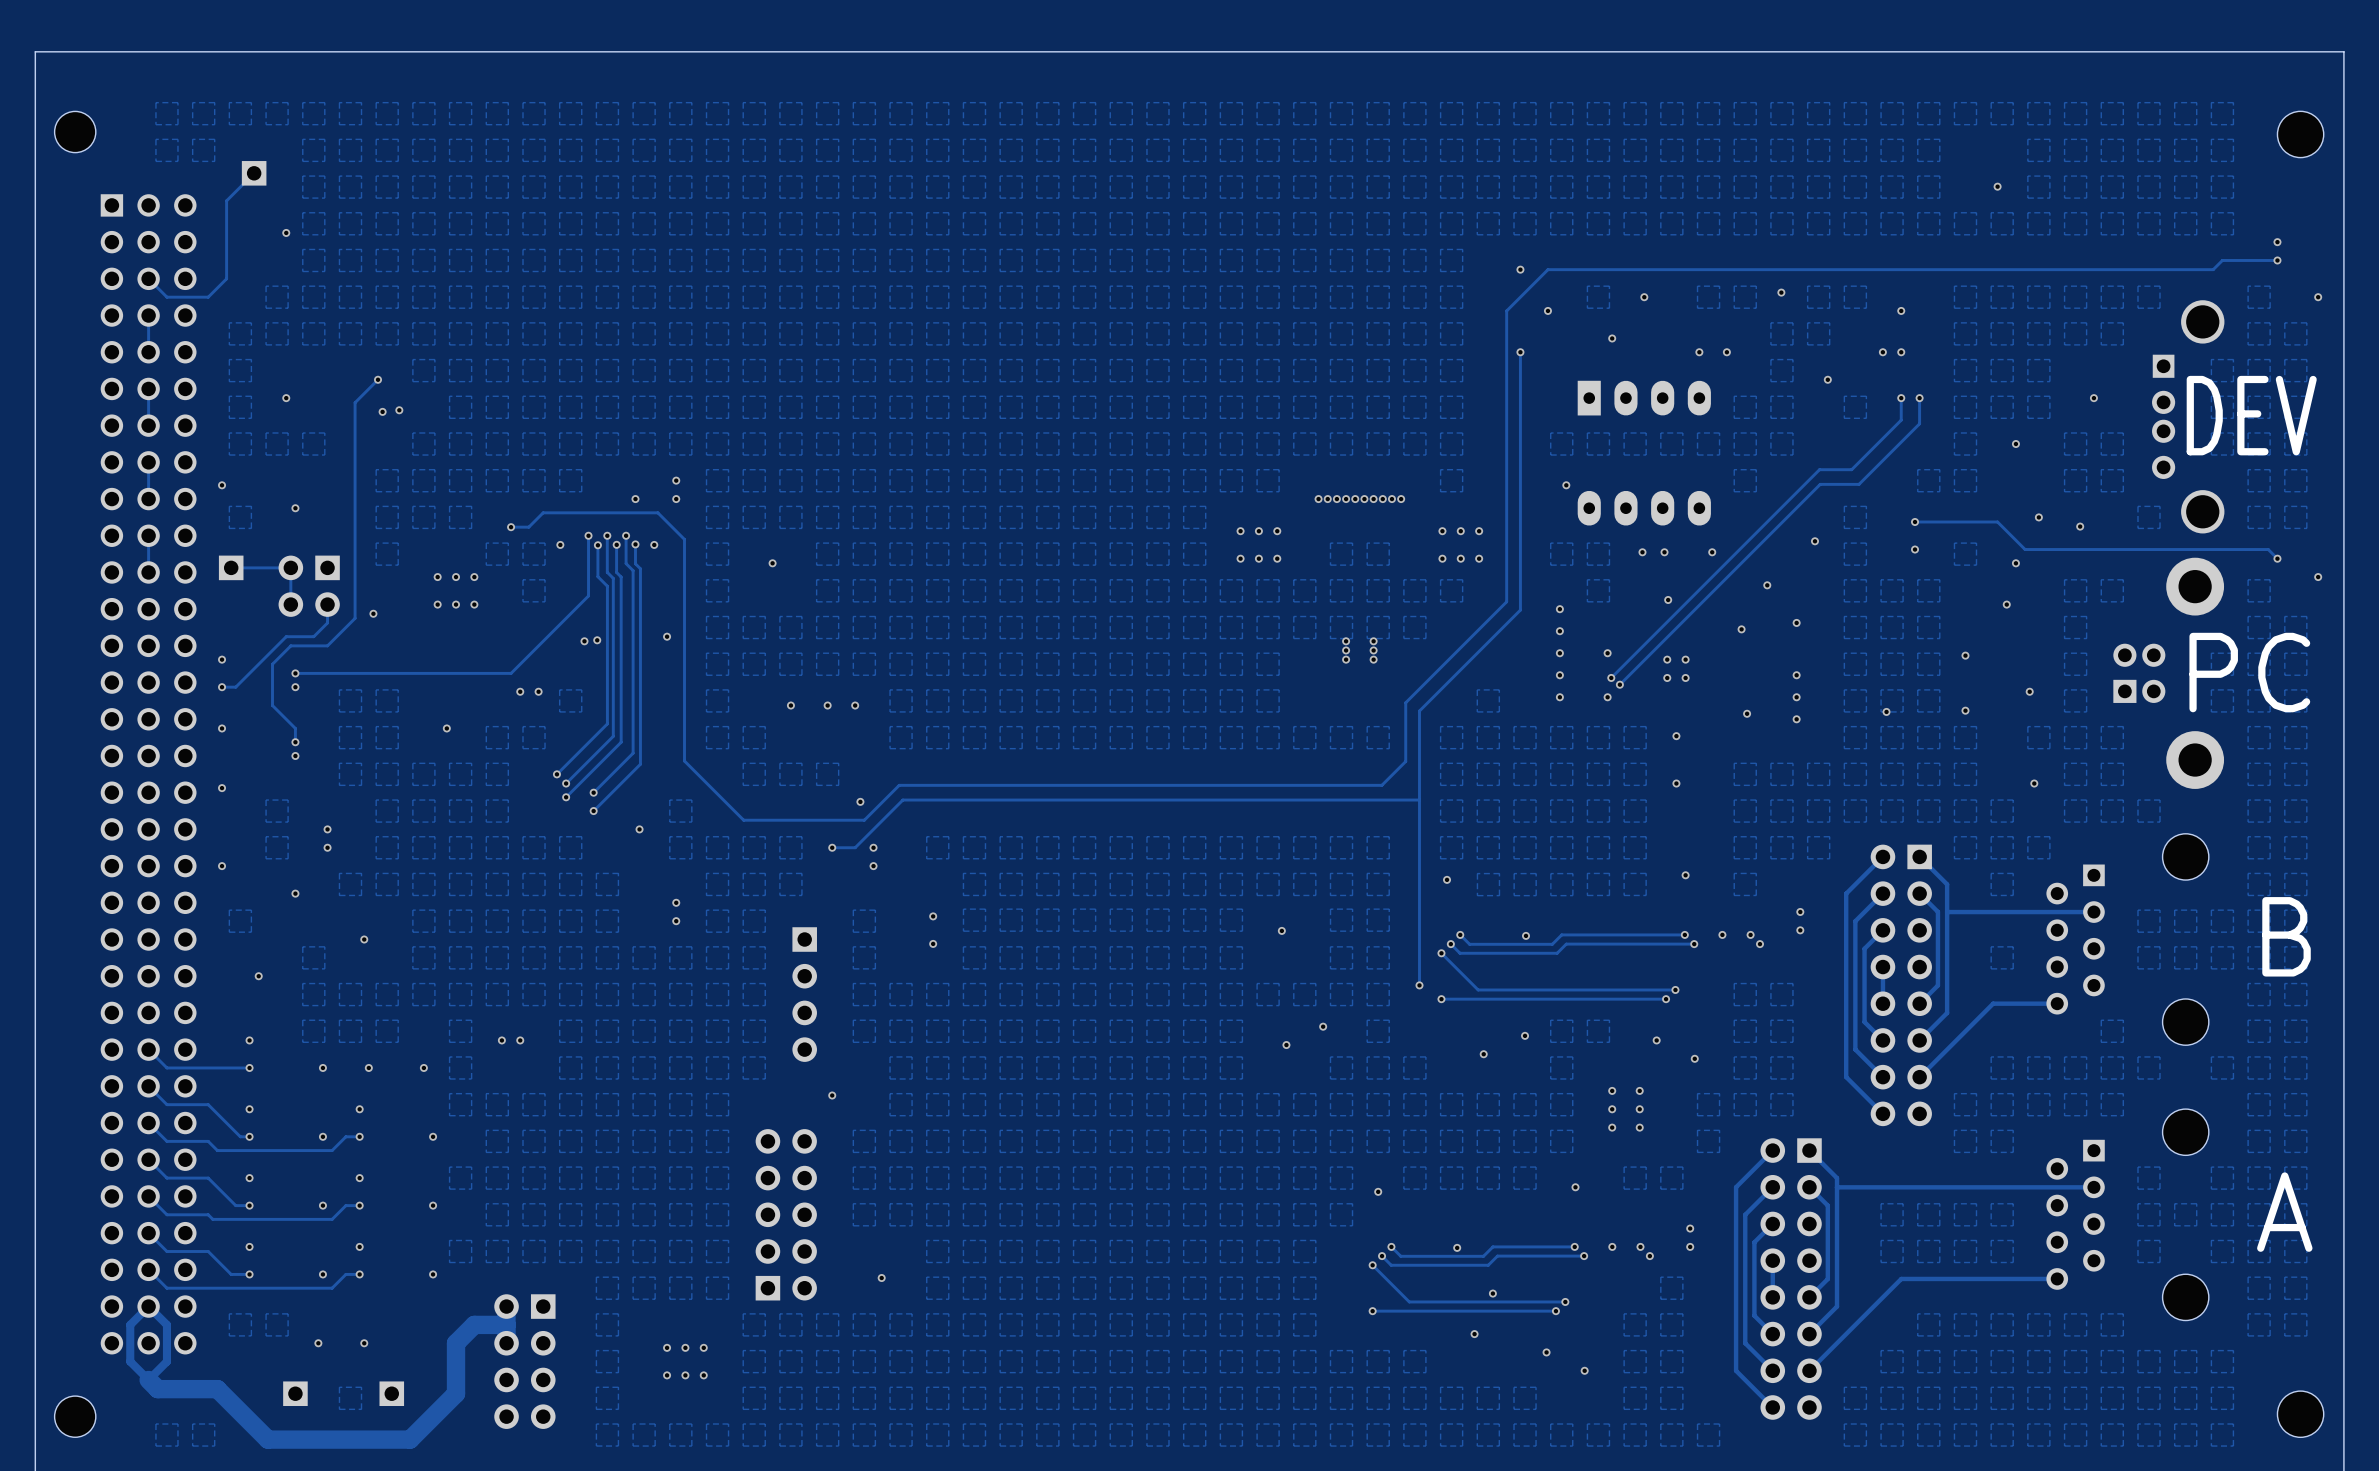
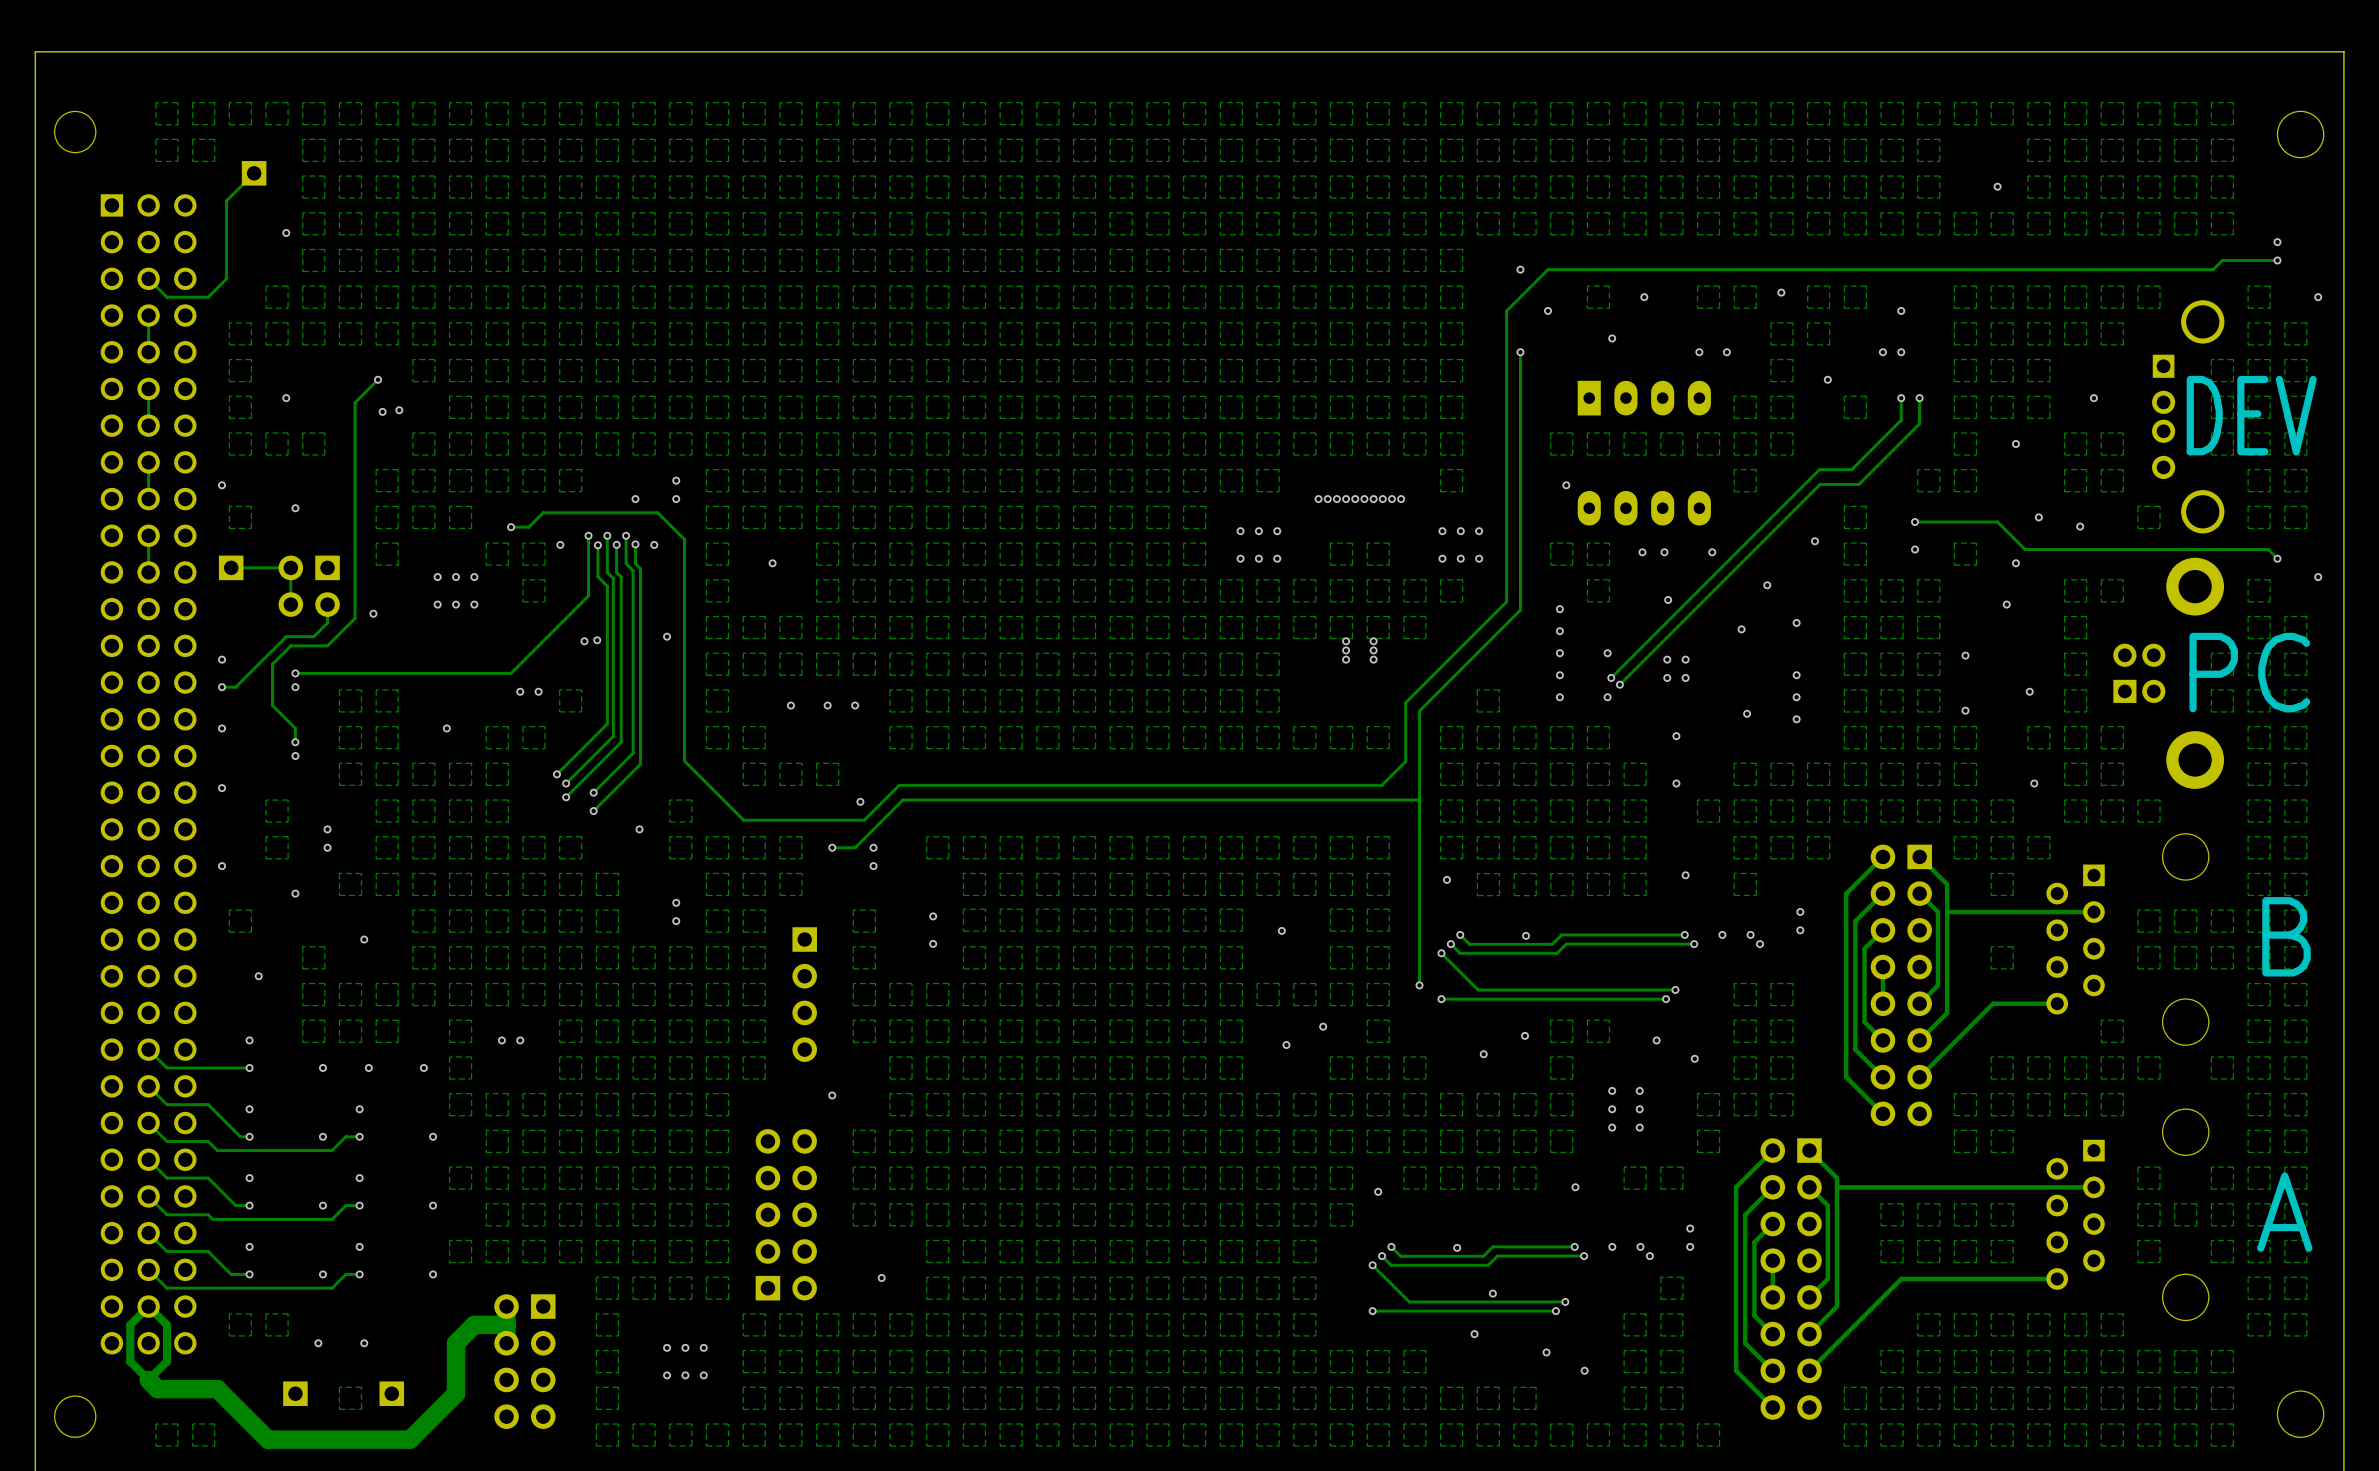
via: (1886, 711) -> none
zone outline: (1646, 726) (1624, 726) (1624, 748) (1646, 748) (1646, 726) -> (1719, 800) (1697, 800) (1697, 822) (1719, 822) (1719, 800)

